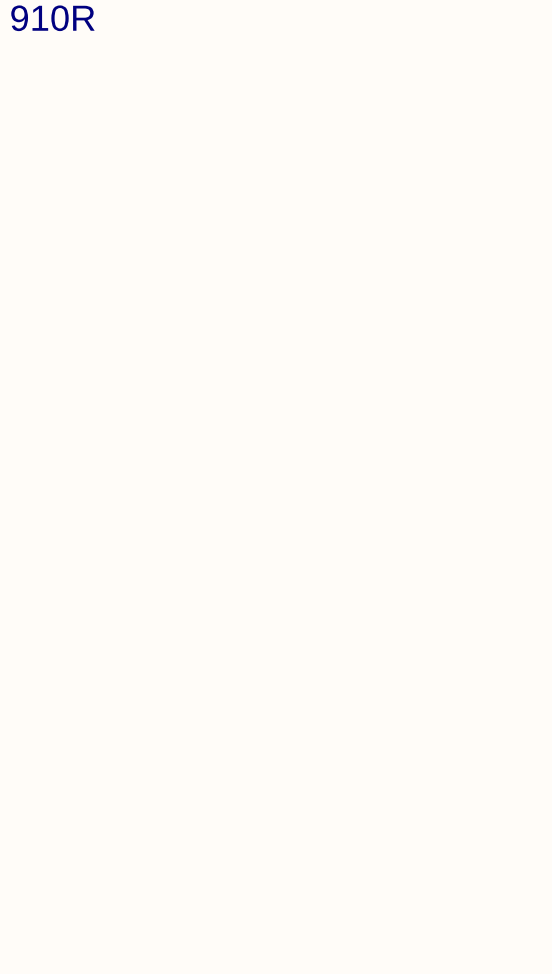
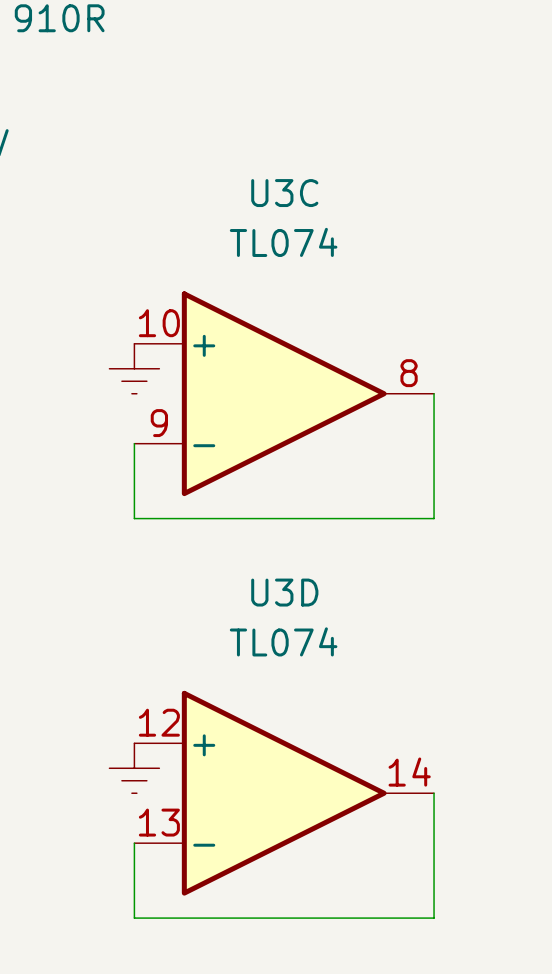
power symbol: none -> (134, 368)
U3C: none -> TL074 (284, 393)
wire: none -> (434, 393) (434, 518) (134, 518) (134, 443)
power symbol: none -> (134, 768)
U3D: none -> TL074 (284, 793)
wire: none -> (434, 793) (434, 918) (134, 918) (134, 843)

